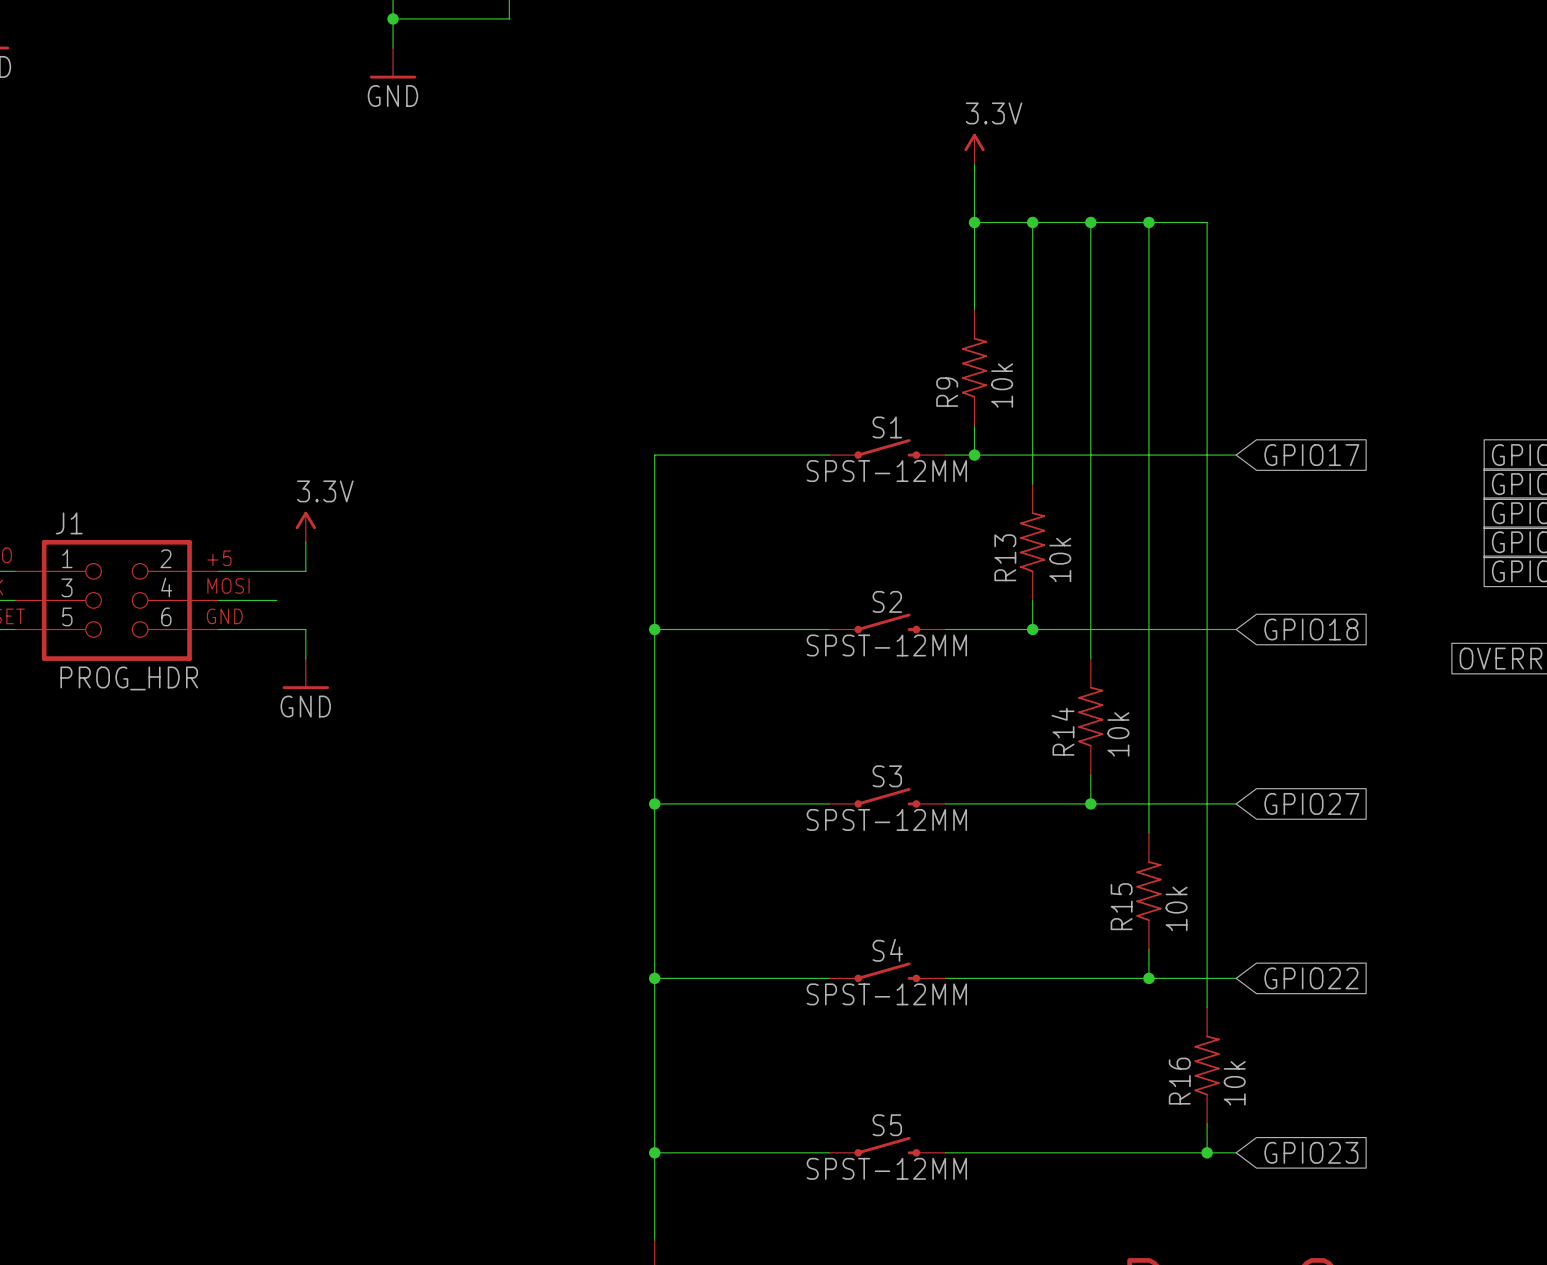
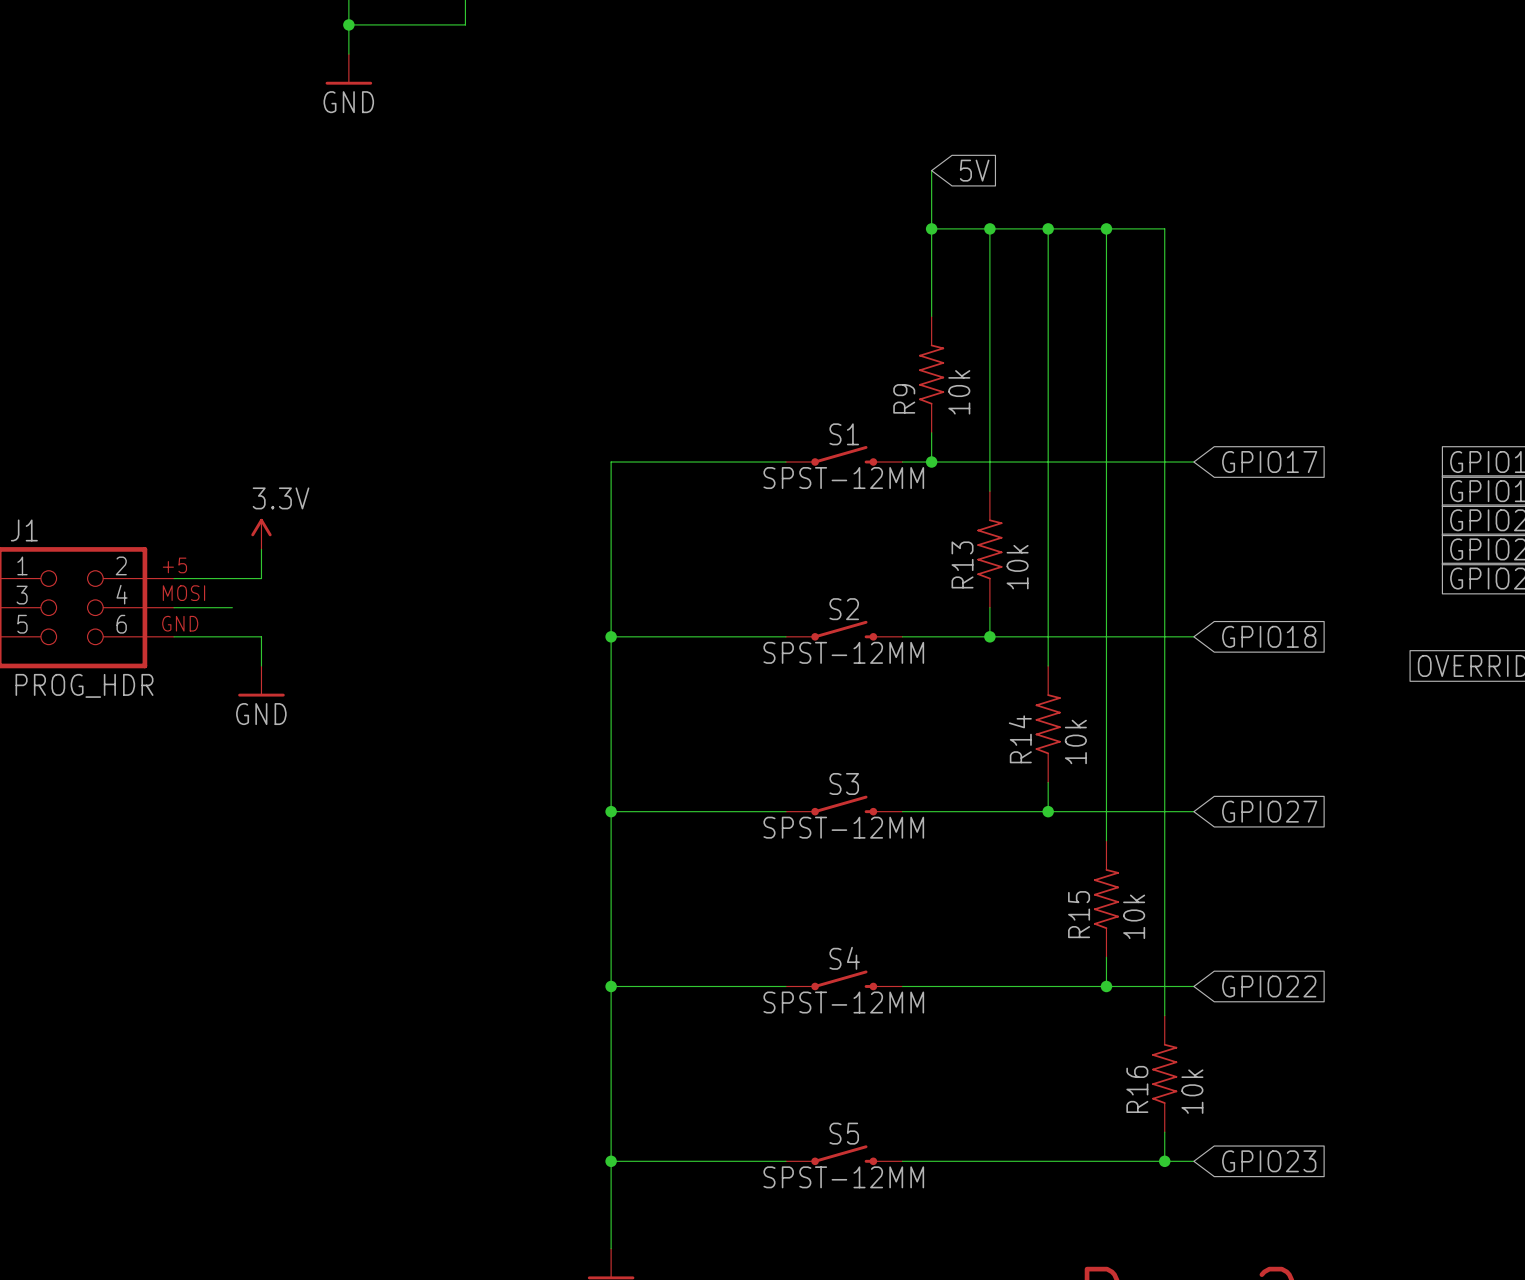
power symbol: 3.3V (974, 149) -> none
global label: none -> 5V (974, 170)

